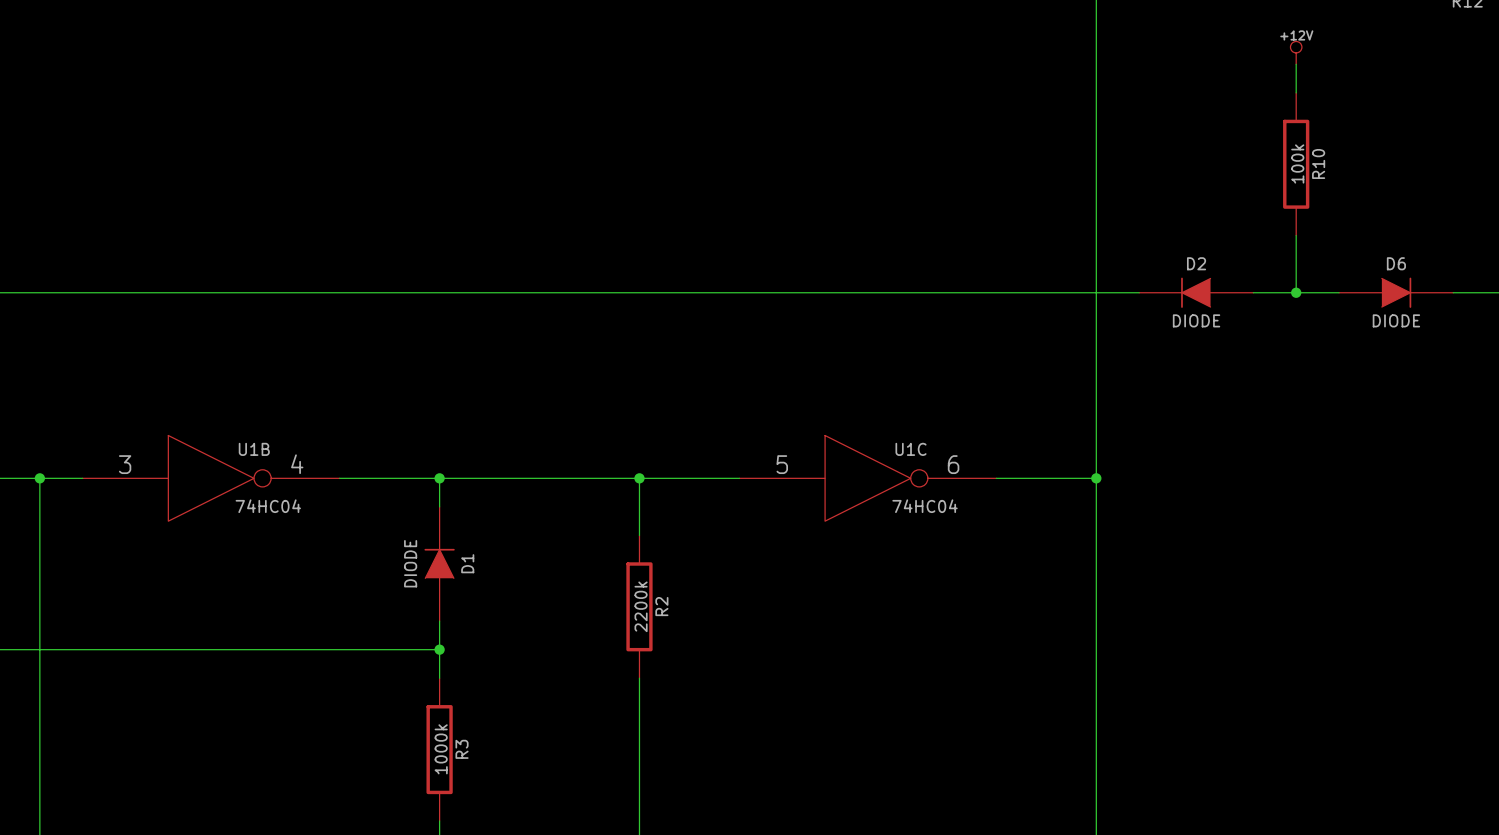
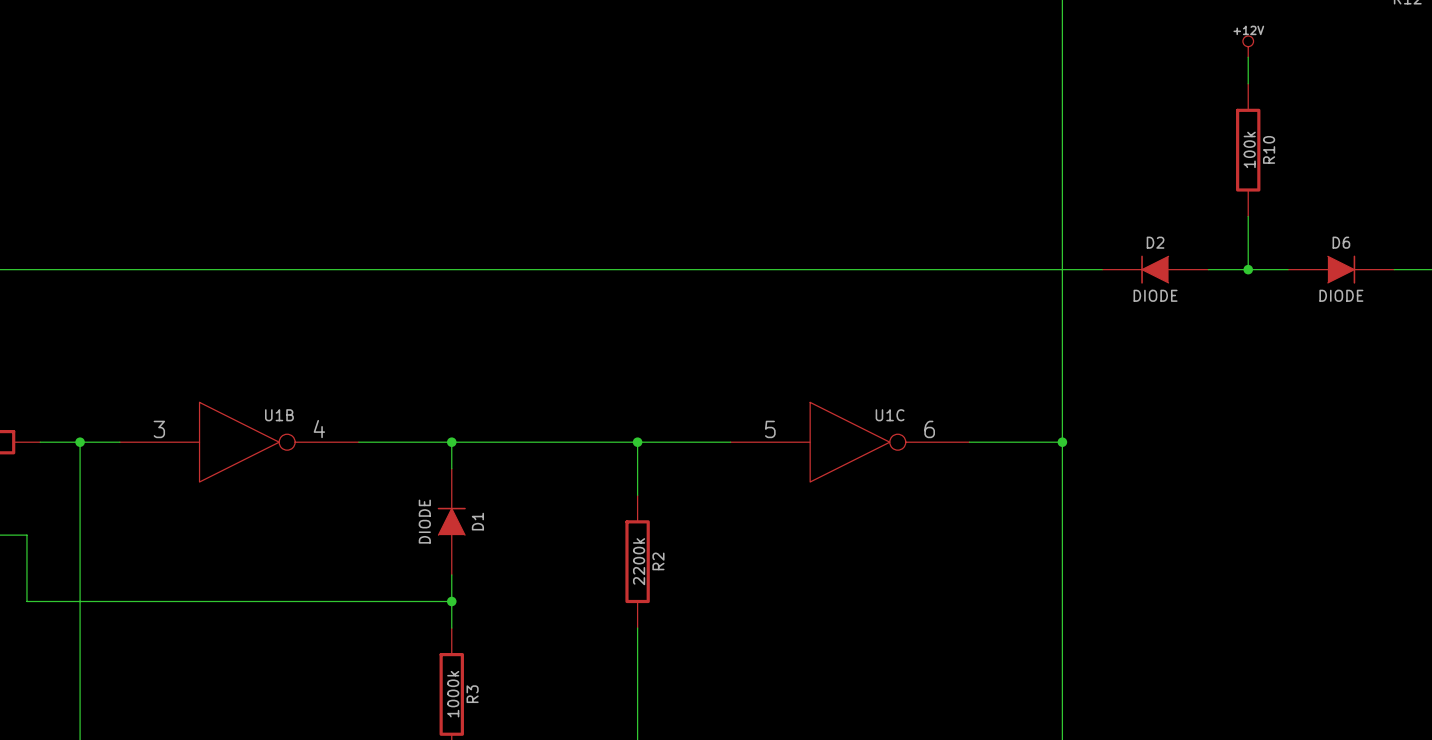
U1B value: 74HC04 (268, 506) -> none
U1C value: 74HC04 (925, 506) -> none

